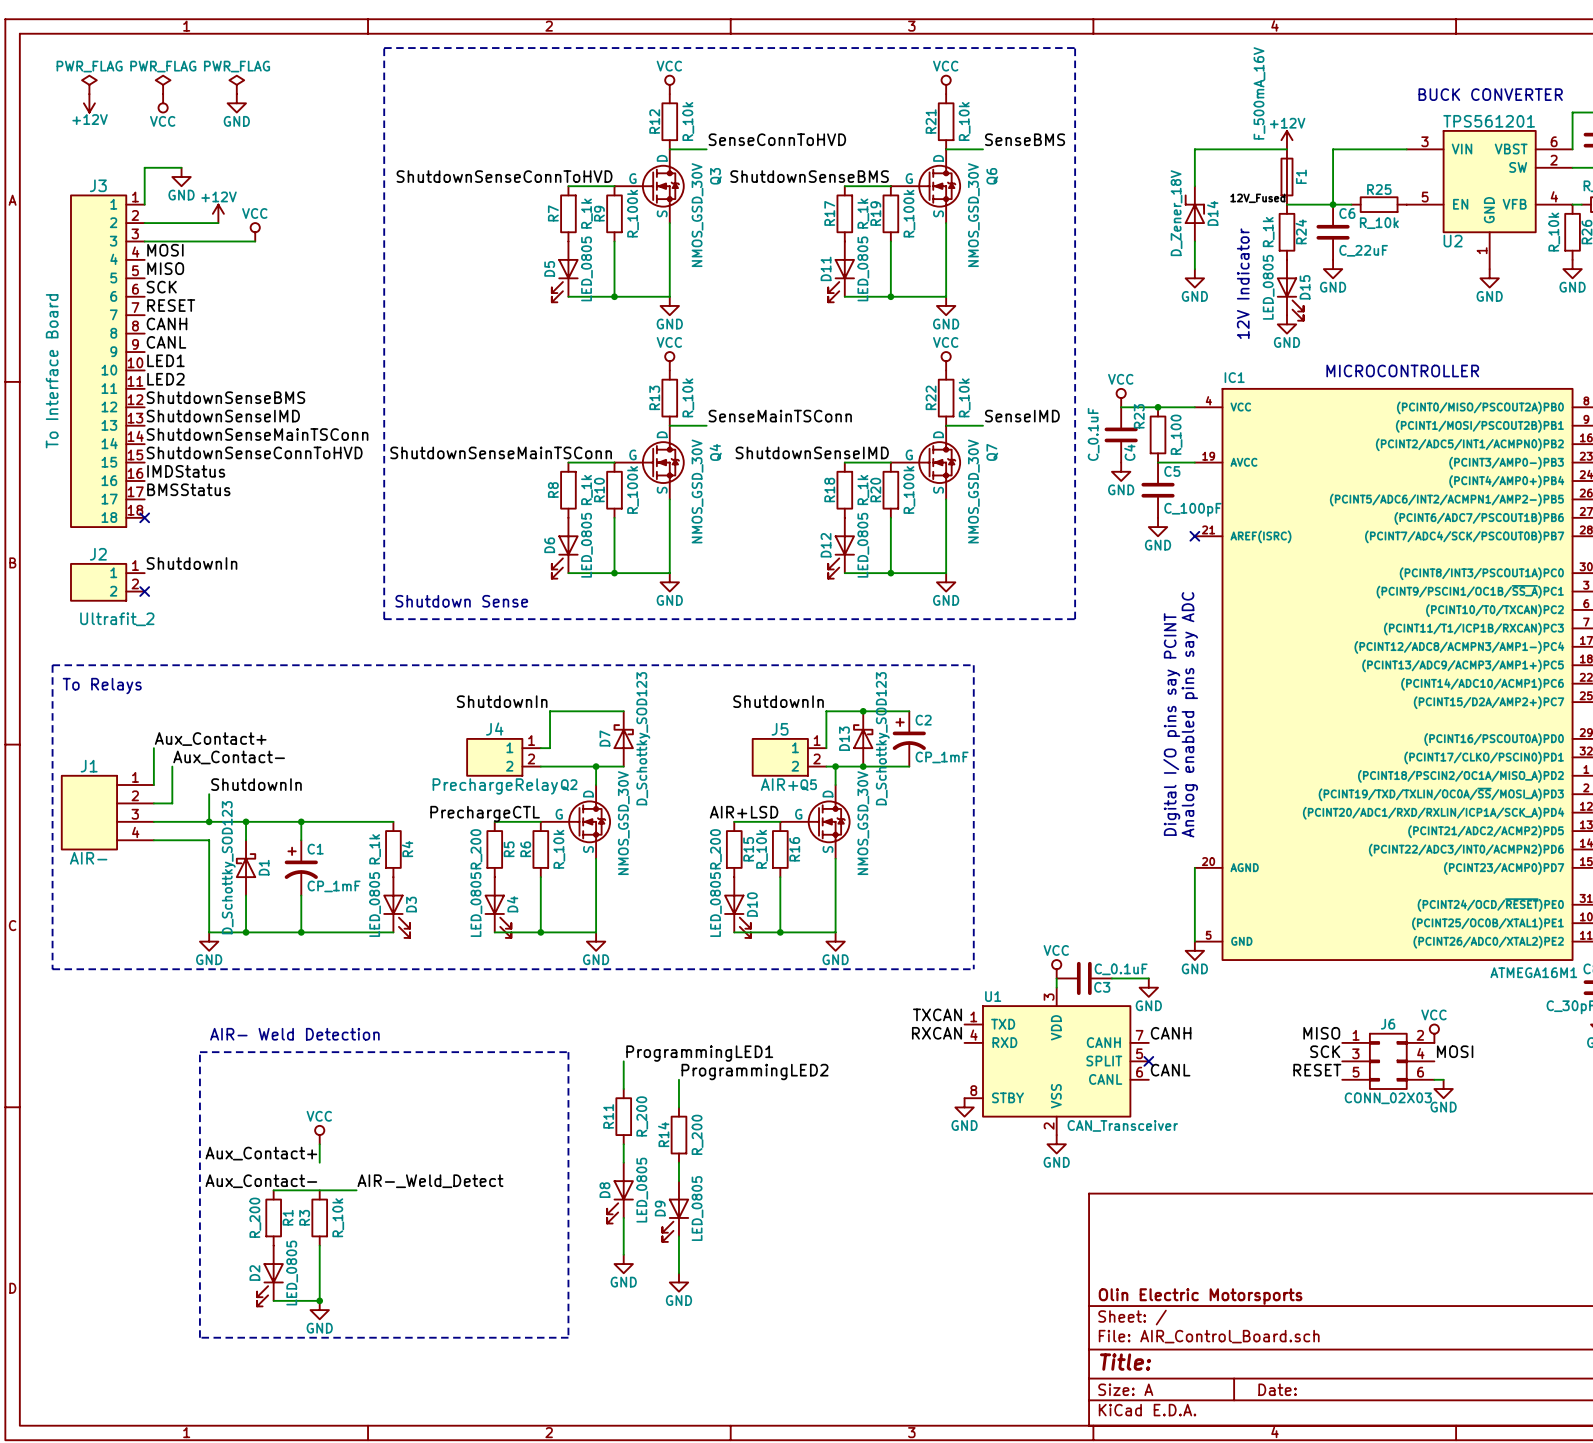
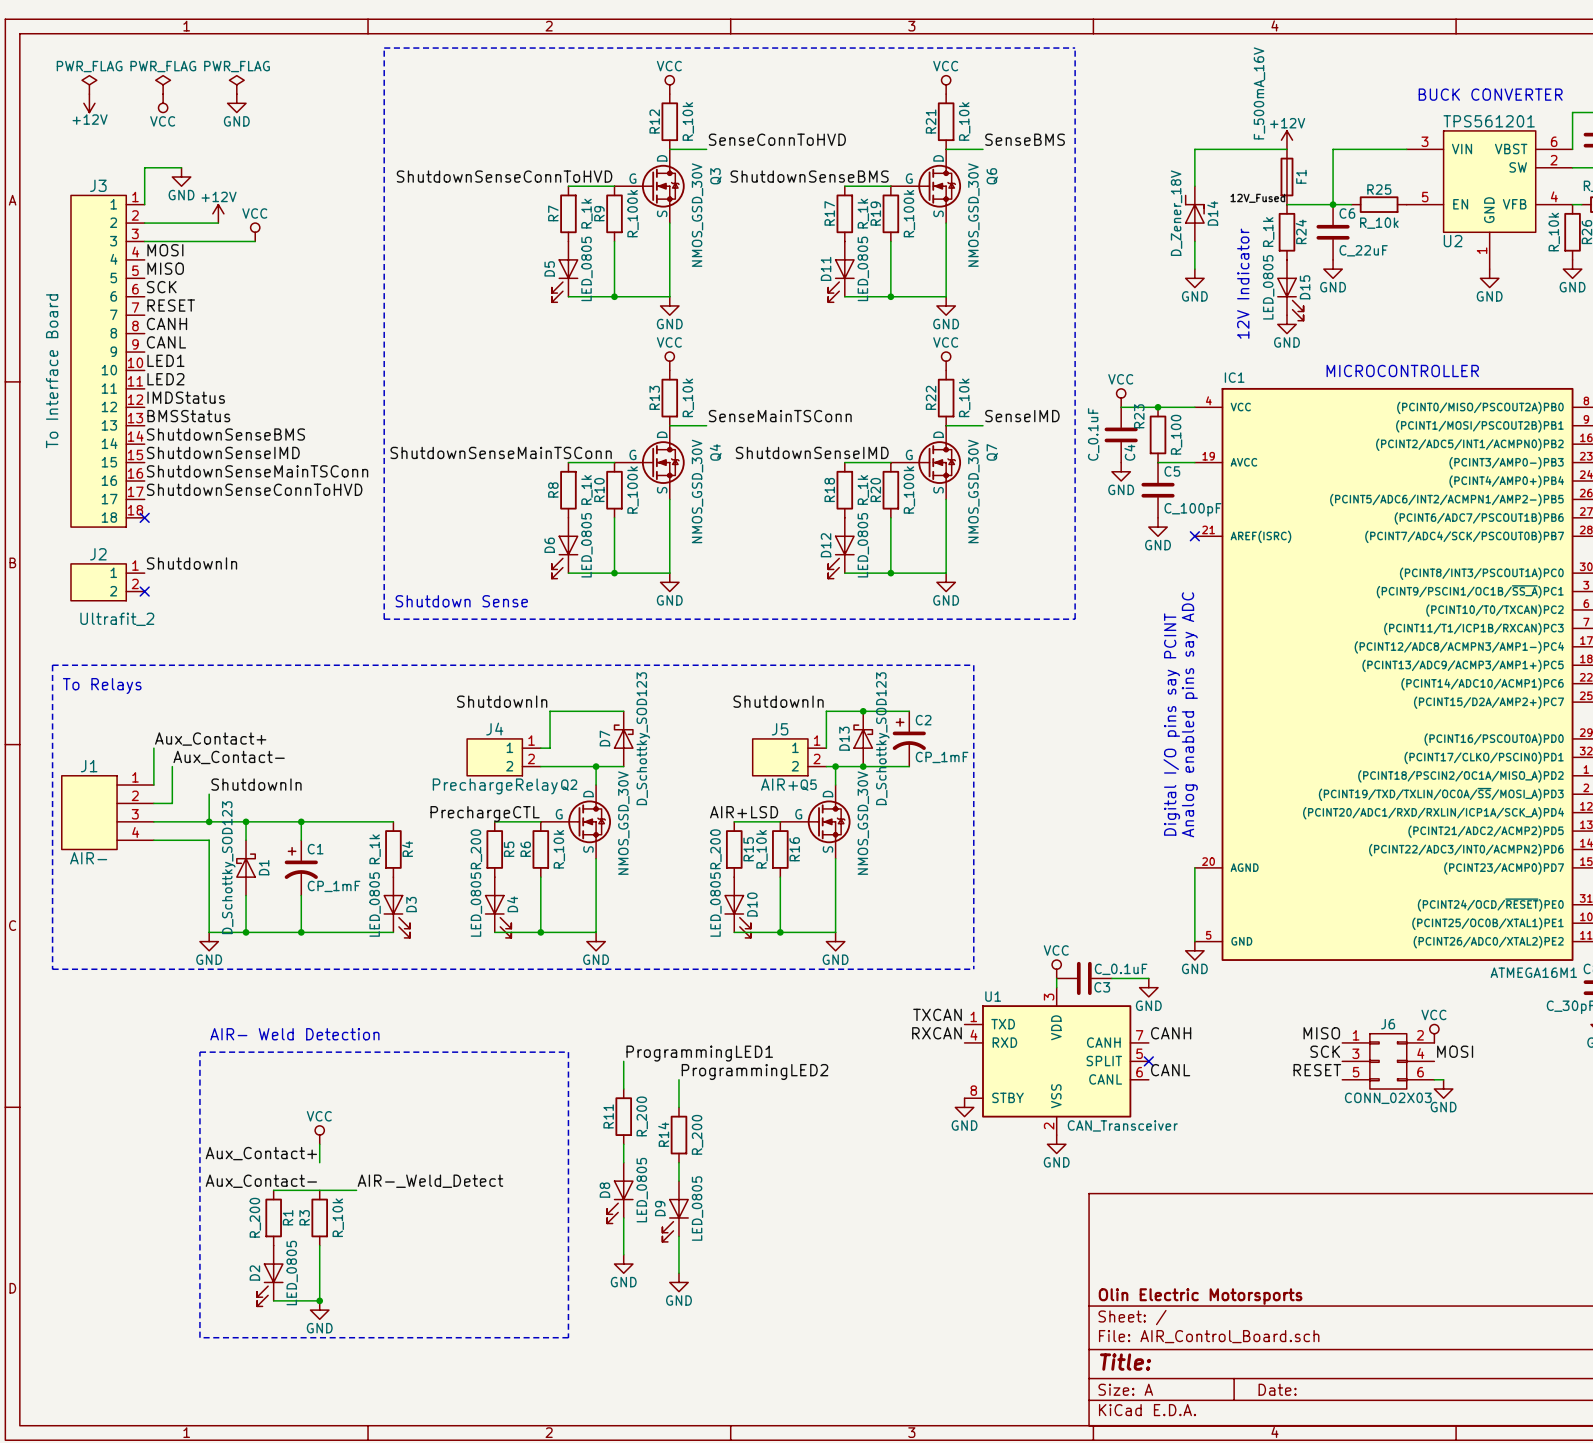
label: ShutdownSenseBMS (225, 397) -> IMDStatus (186, 397)
label: ShutdownSenseIMD (223, 416) -> BMSStatus (188, 416)
label: ShutdownSenseMainTSConn (257, 434) -> ShutdownSenseBMS (225, 434)
label: ShutdownSenseConnToHVD (254, 452) -> ShutdownSenseIMD (223, 452)
label: IMDStatus (186, 471) -> ShutdownSenseMainTSConn (257, 471)
label: BMSStatus (188, 489) -> ShutdownSenseConnToHVD (254, 489)

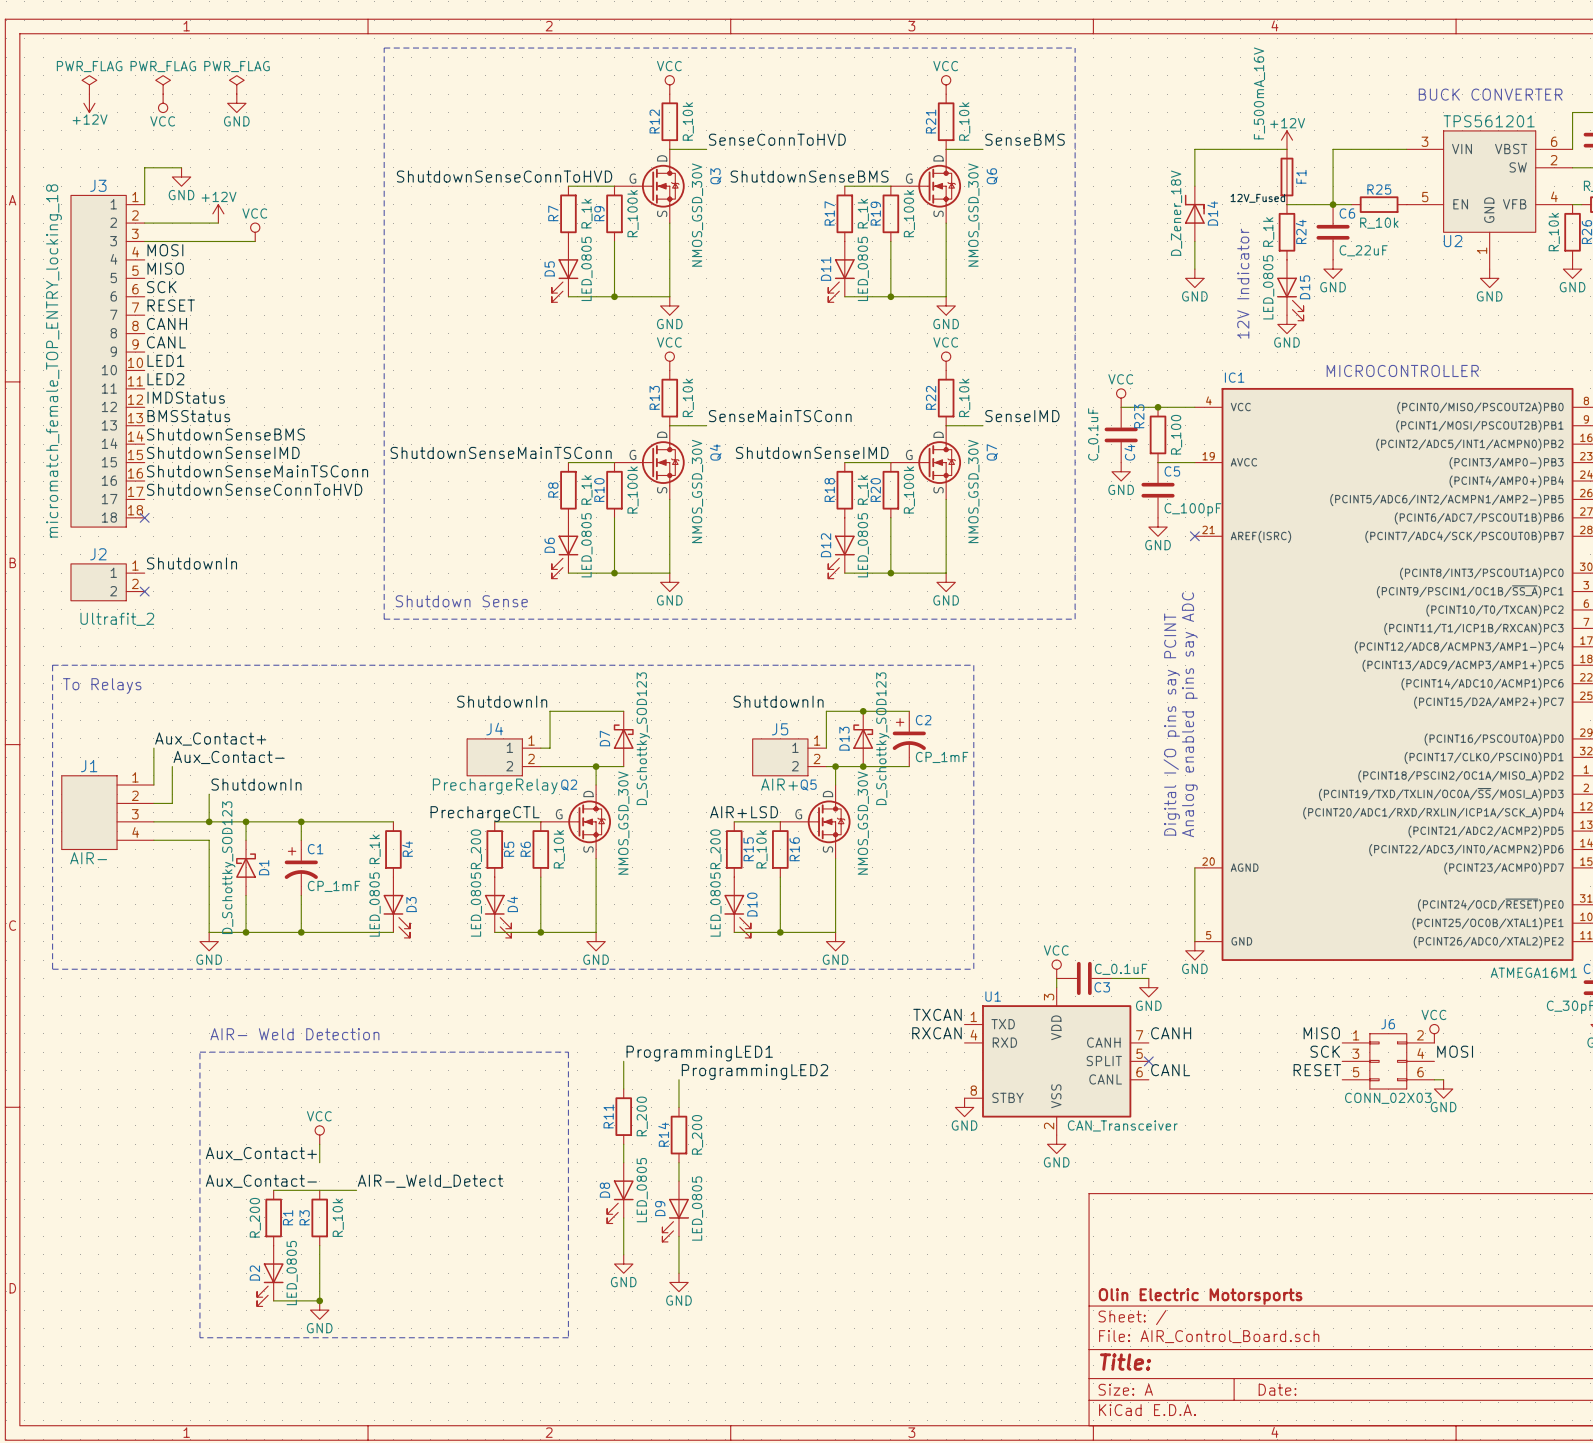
J3 value: To Interface Board (52, 371) -> micromatch_female_TOP_ENTRY_locking_18 (53, 360)

